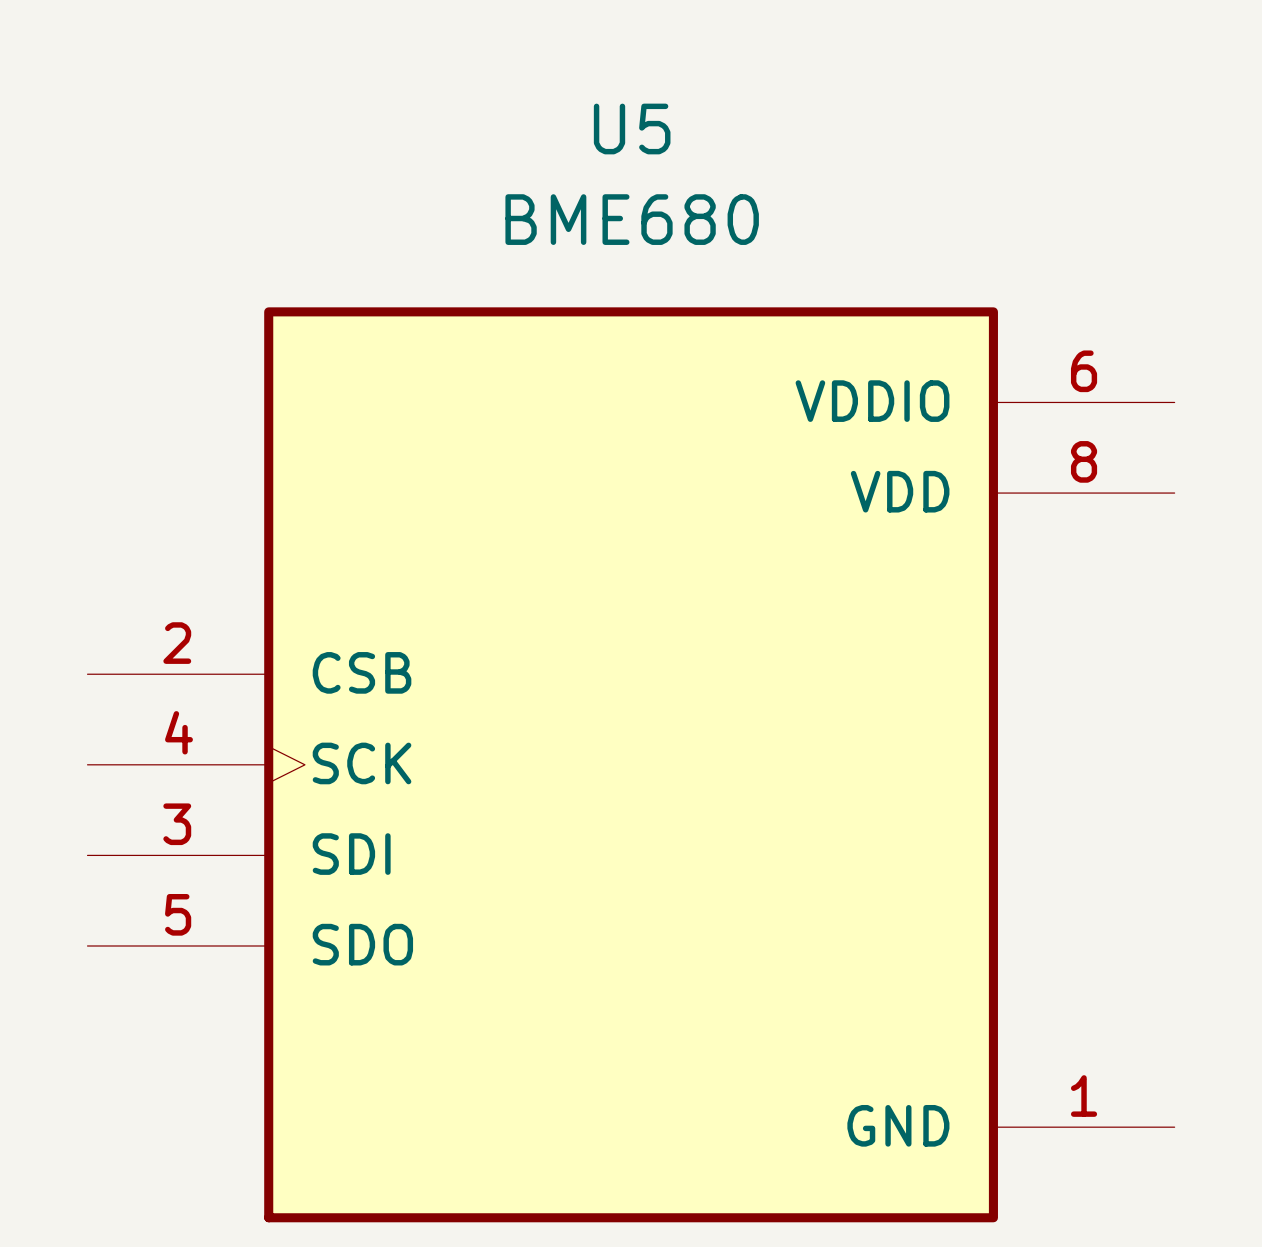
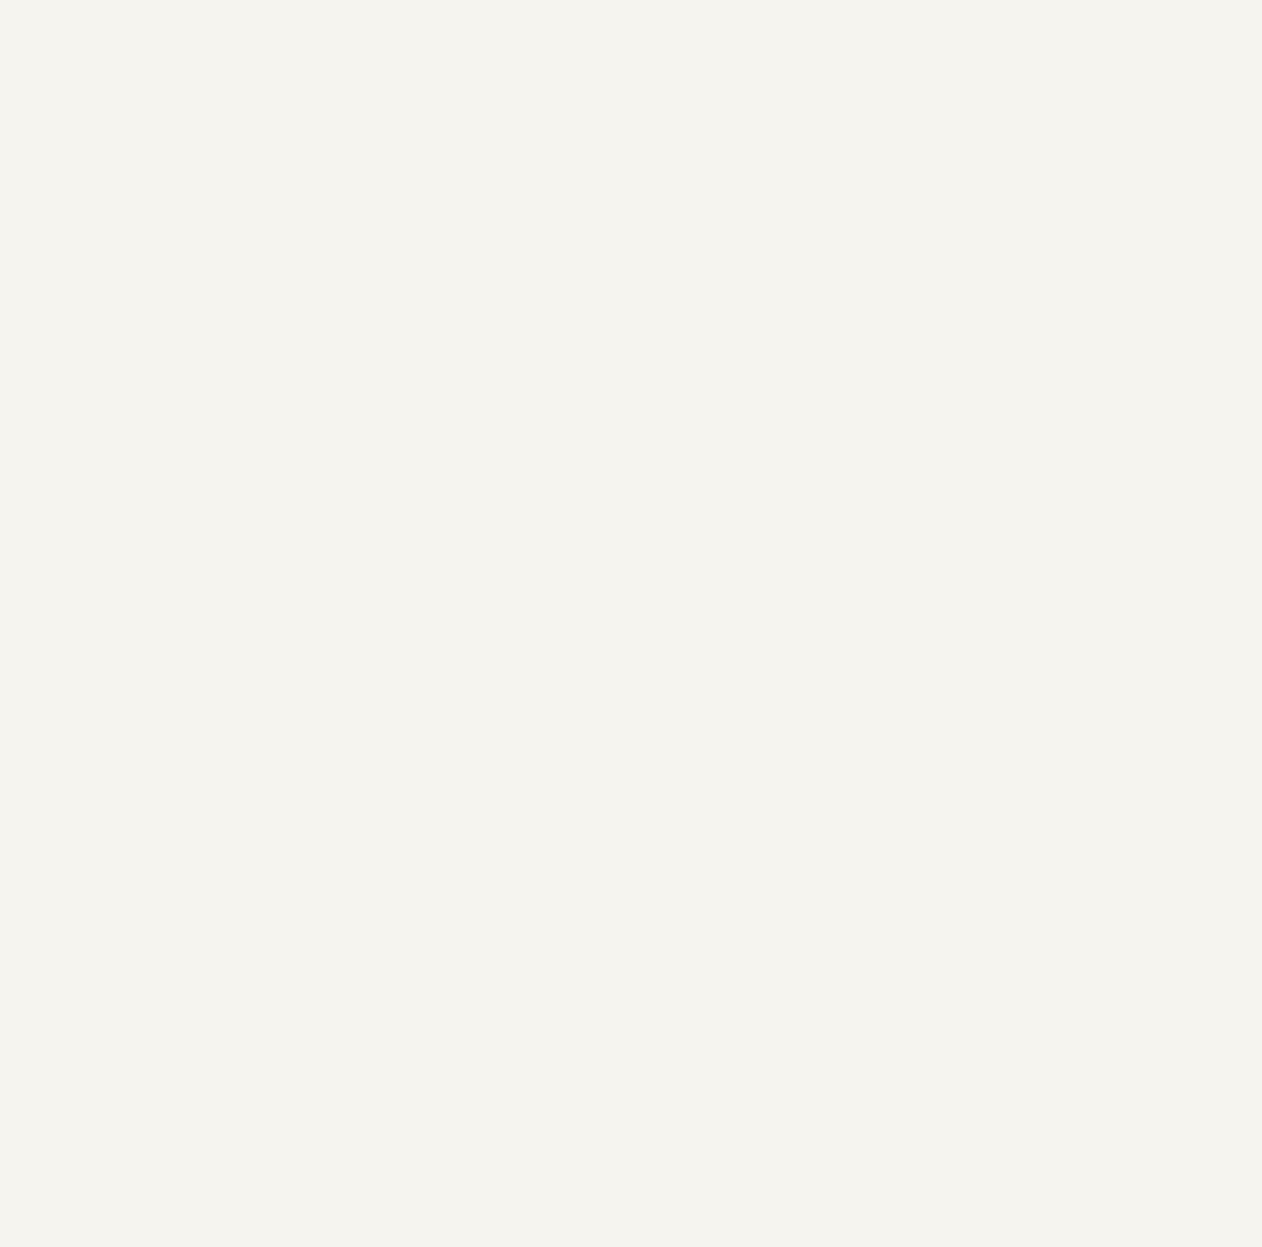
U5: BME680 (631, 764) -> none

